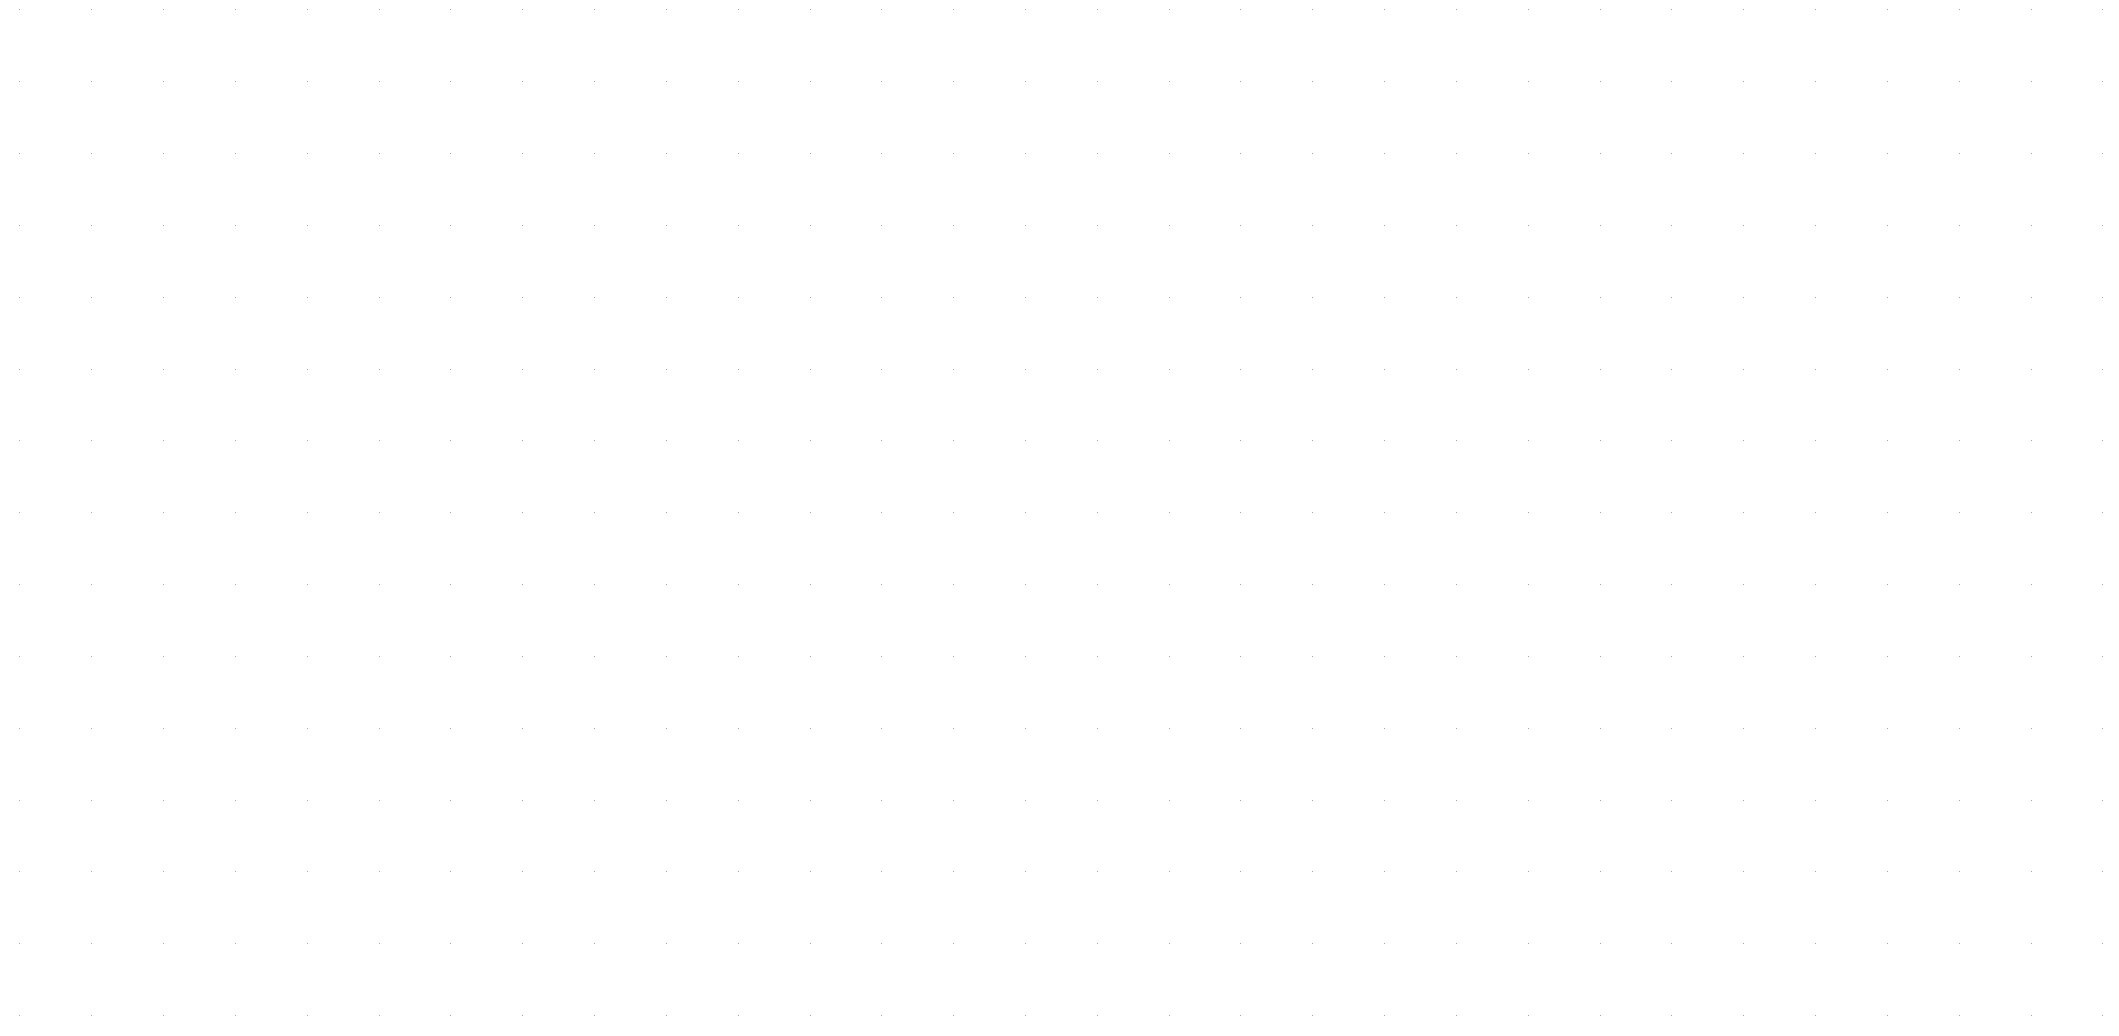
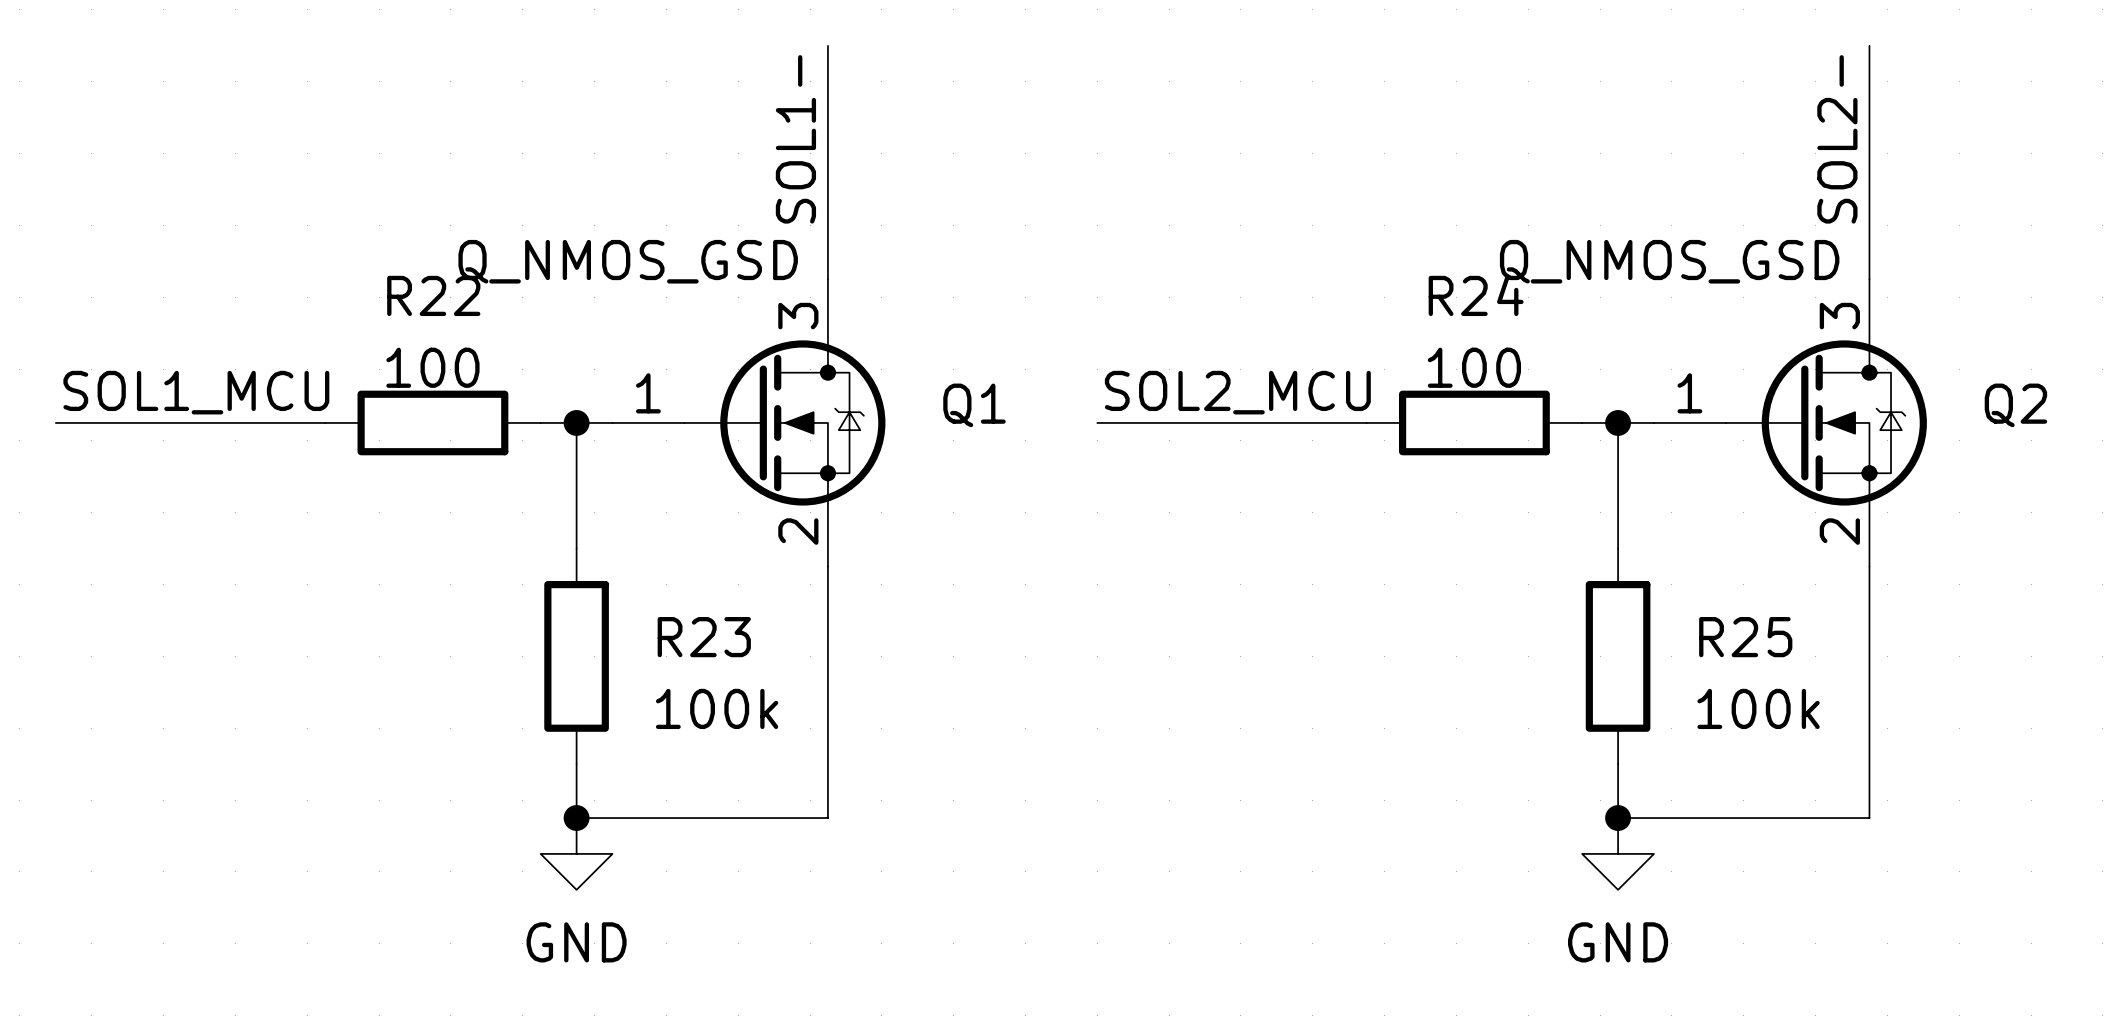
wire: none -> (827, 45) (827, 279)
wire: none -> (1869, 45) (1869, 279)
label: none -> SOL1- (795, 139)
label: none -> SOL2- (1837, 139)
label: none -> SOL1_MCU (196, 392)
label: none -> SOL2_MCU (1237, 392)
wire: none -> (55, 422) (325, 422)
R22: none -> 100 (432, 422)
wire: none -> (540, 422) (612, 422)
wire: none -> (576, 422) (576, 548)
junction: none -> (576, 422)
Q1: none -> Q_NMOS_GSD (748, 422)
wire: none -> (1097, 422) (1366, 422)
R24: none -> 100 (1474, 422)
wire: none -> (1582, 422) (1653, 422)
wire: none -> (1618, 422) (1618, 548)
junction: none -> (1618, 422)
Q2: none -> Q_NMOS_GSD (1790, 422)
wire: none -> (827, 566) (827, 818) (576, 818) (576, 764)
wire: none -> (1869, 566) (1869, 818) (1618, 818) (1618, 764)
R23: none -> 100k (576, 656)
R25: none -> 100k (1618, 656)
junction: none -> (576, 818)
junction: none -> (1618, 818)
power symbol: none -> GND (576, 853)
power symbol: none -> GND (1618, 853)

